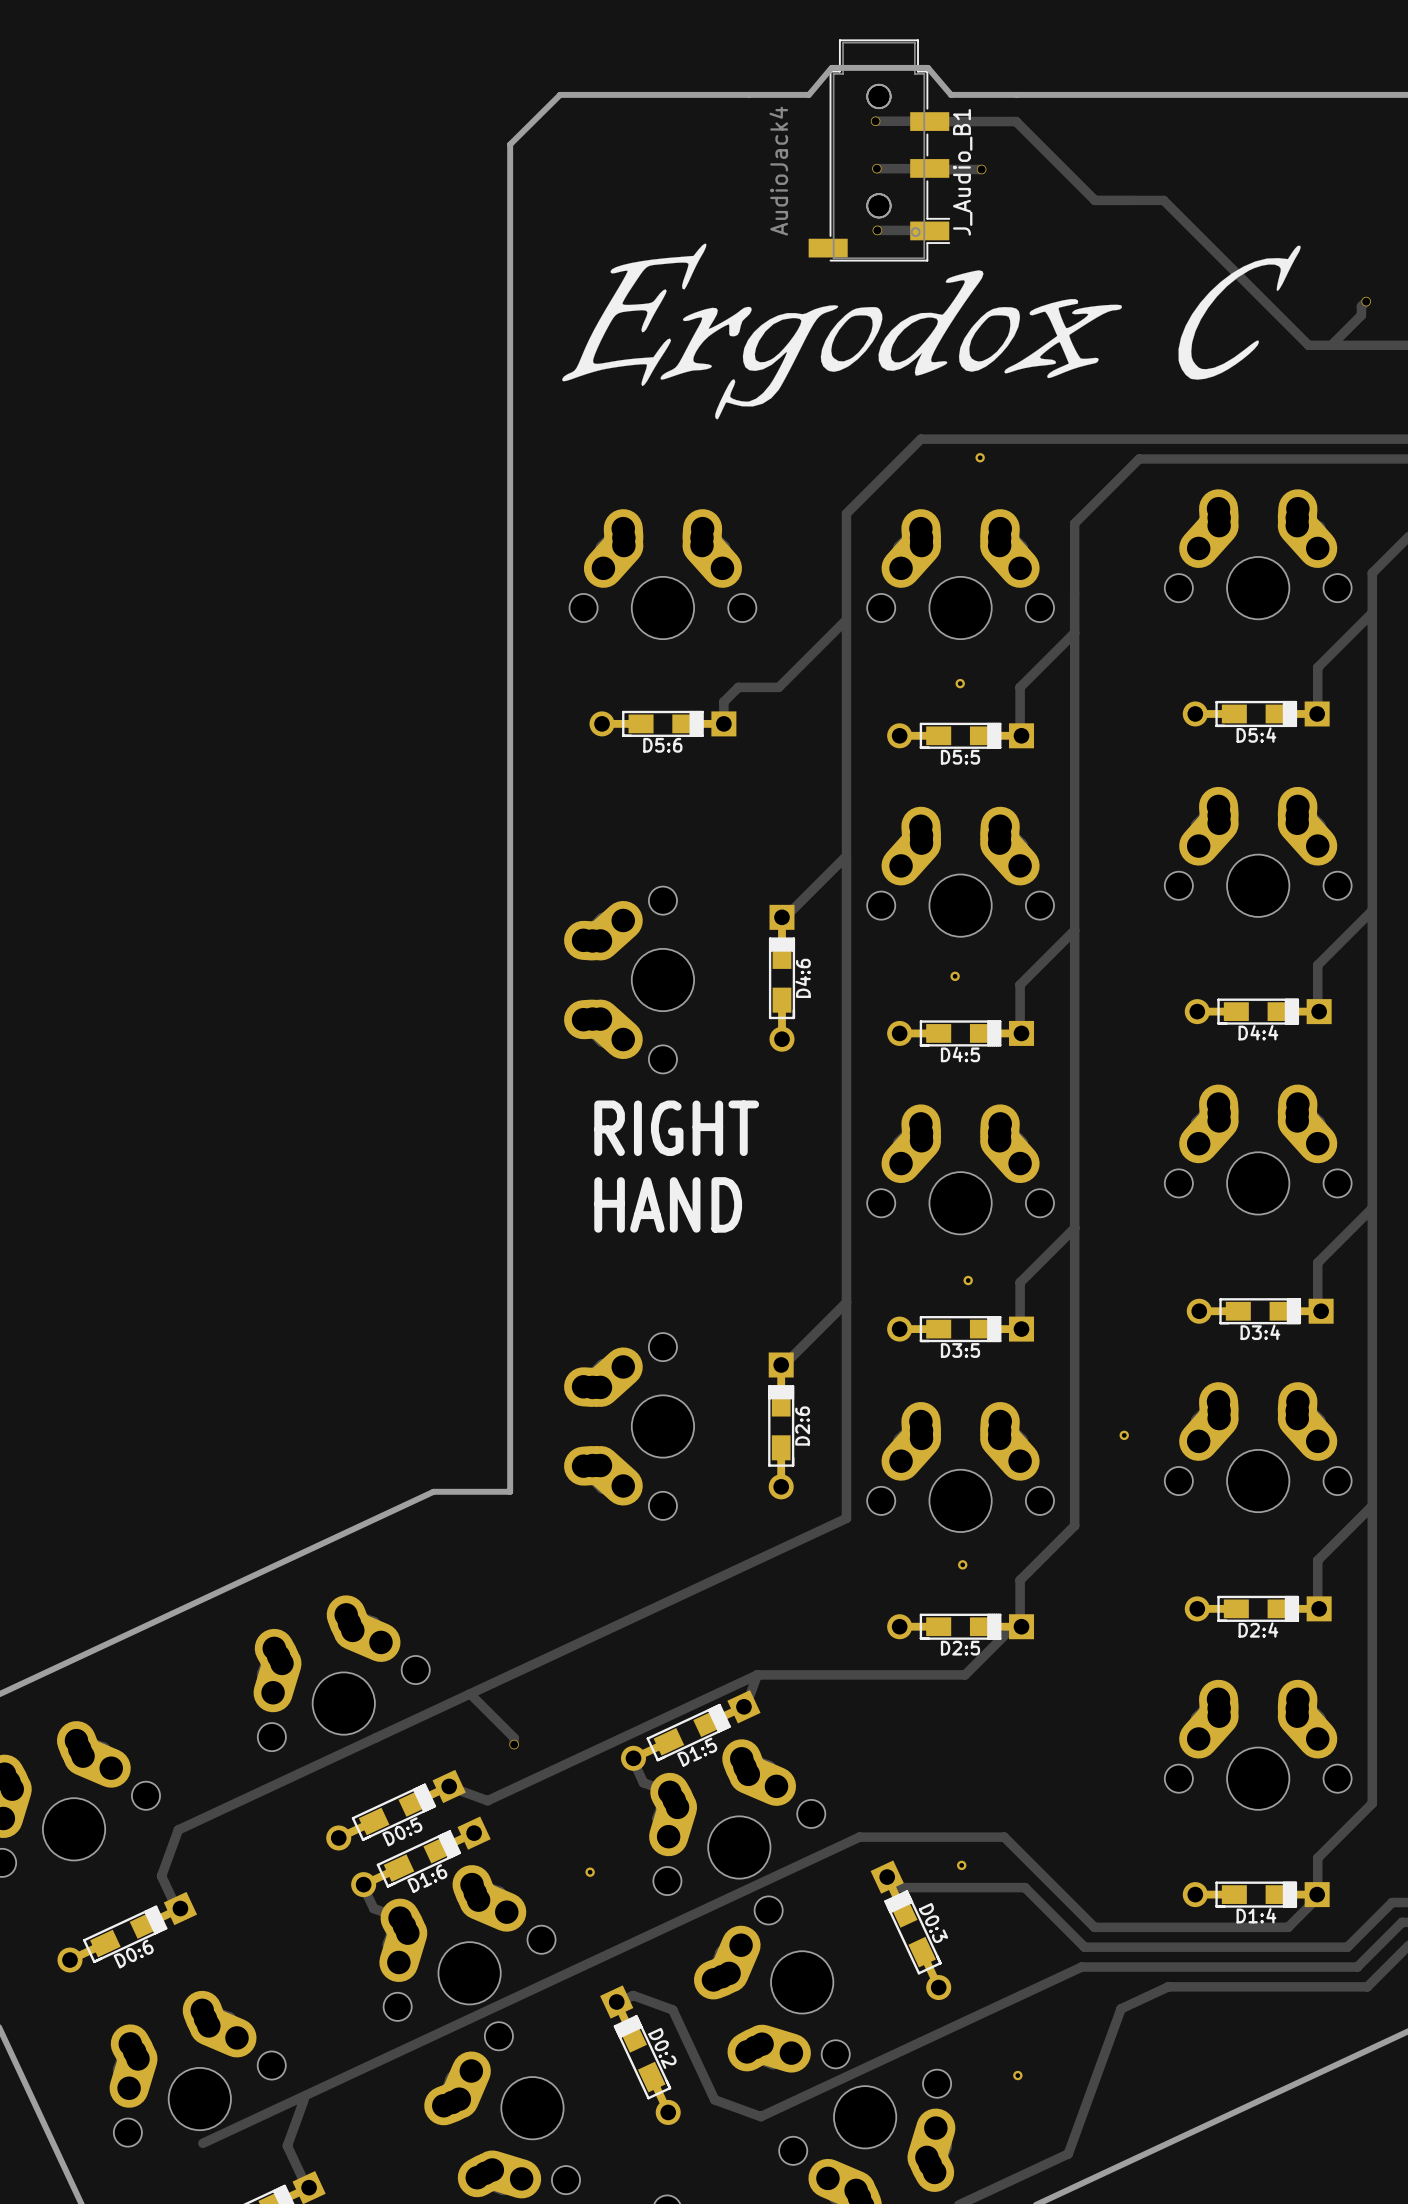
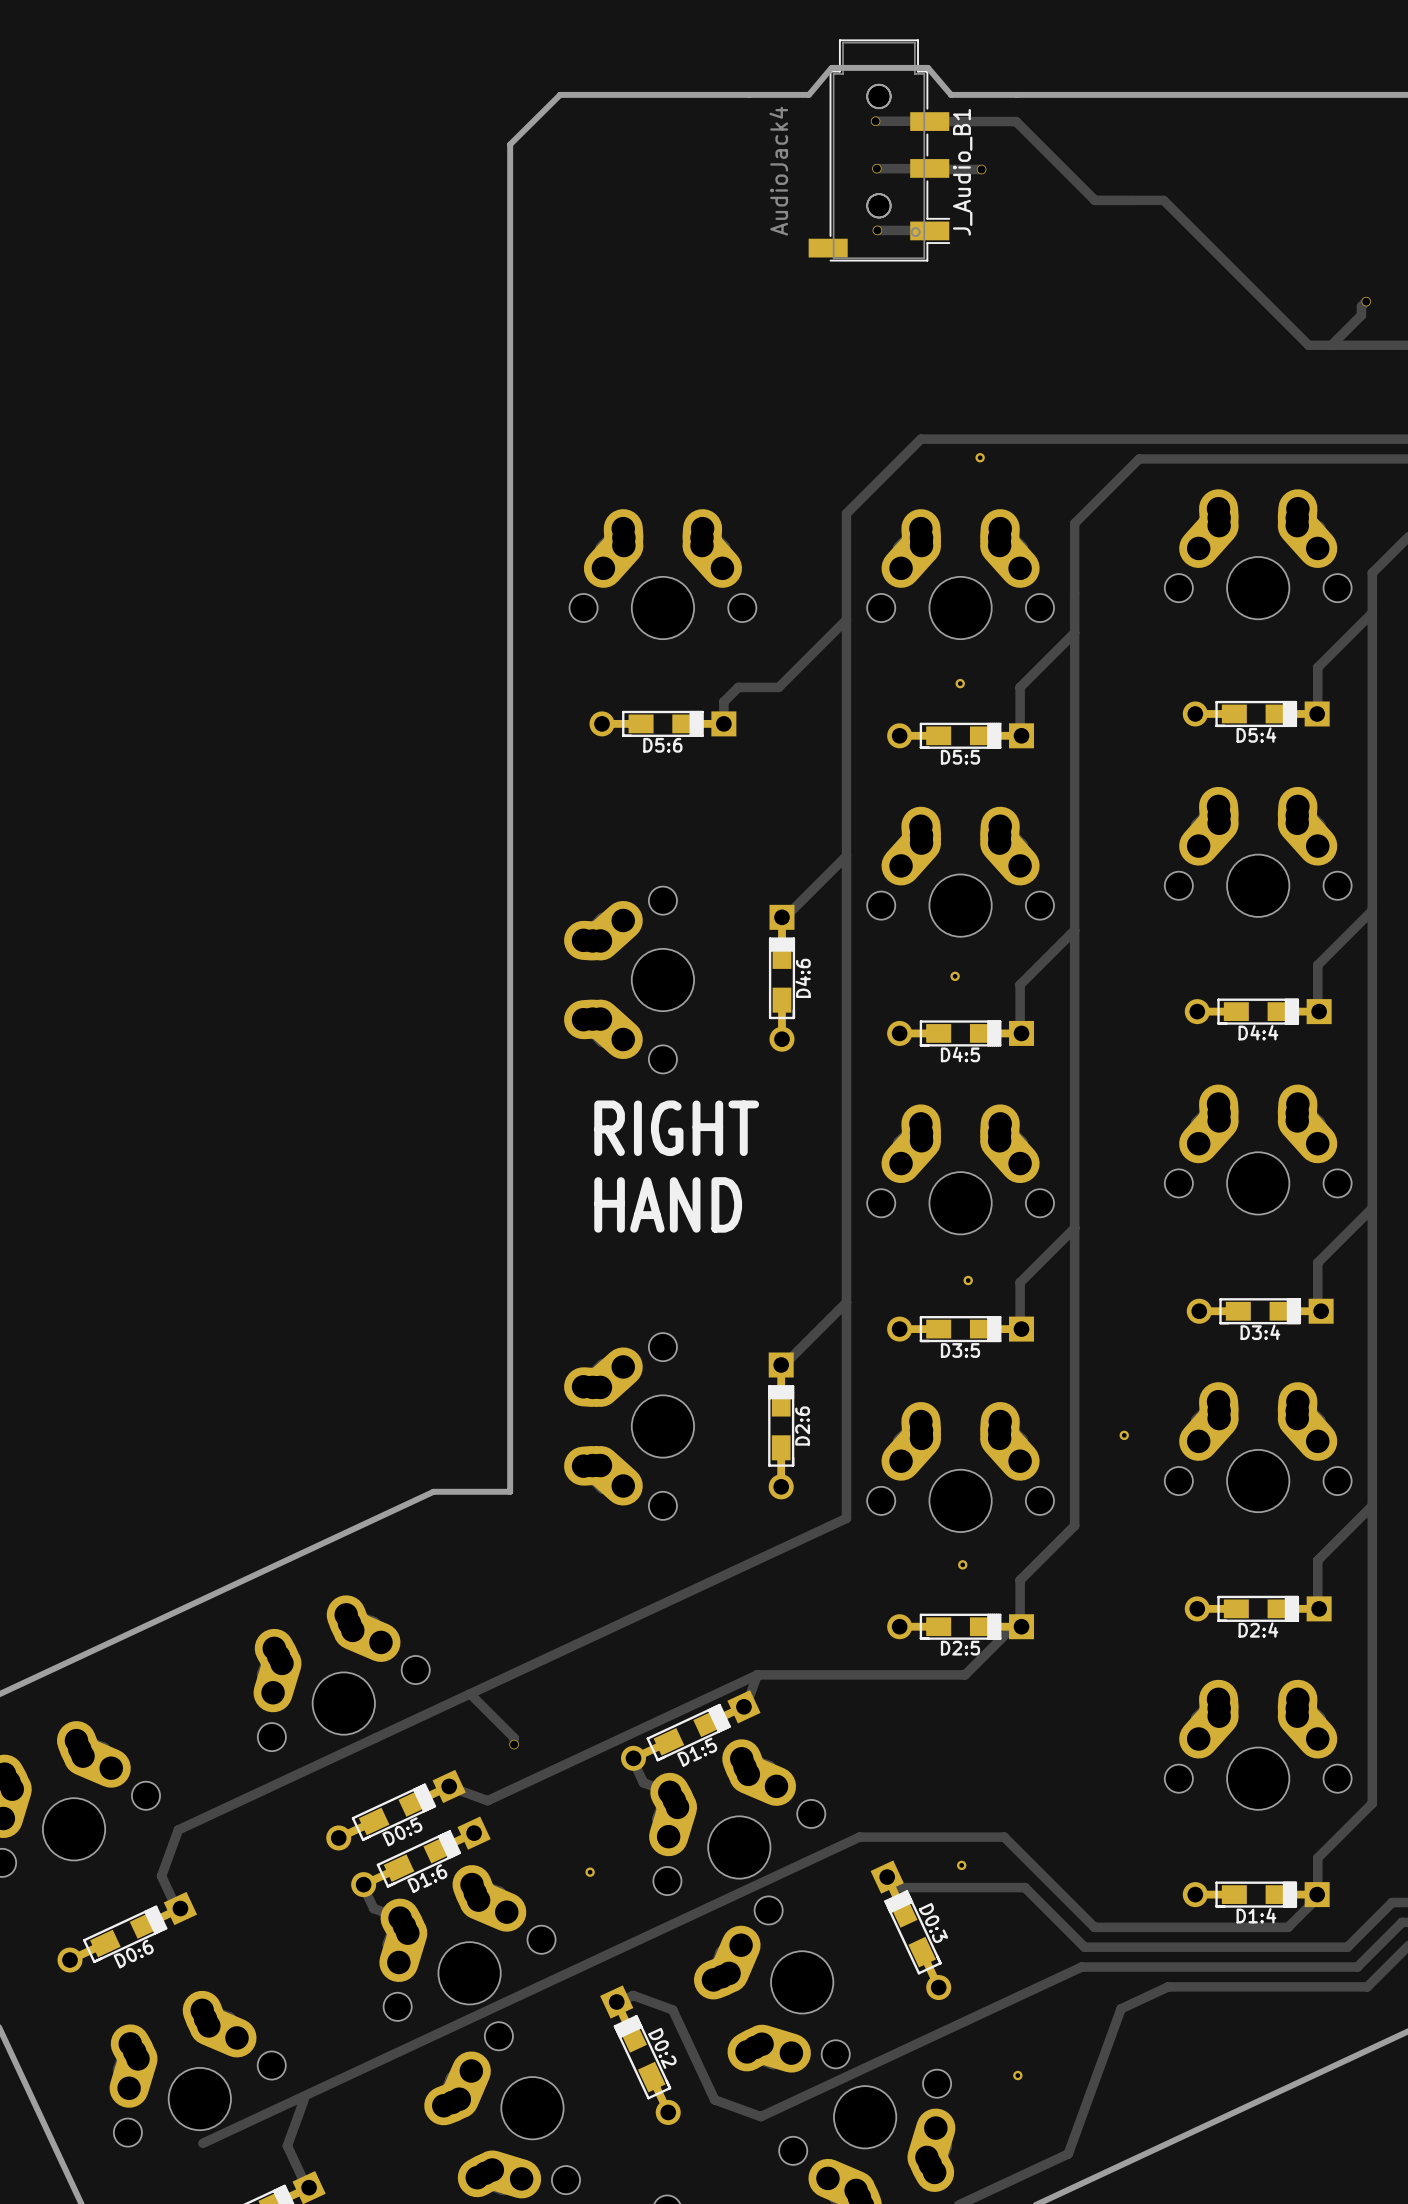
drawing: [562, 243, 1301, 420] -> none

